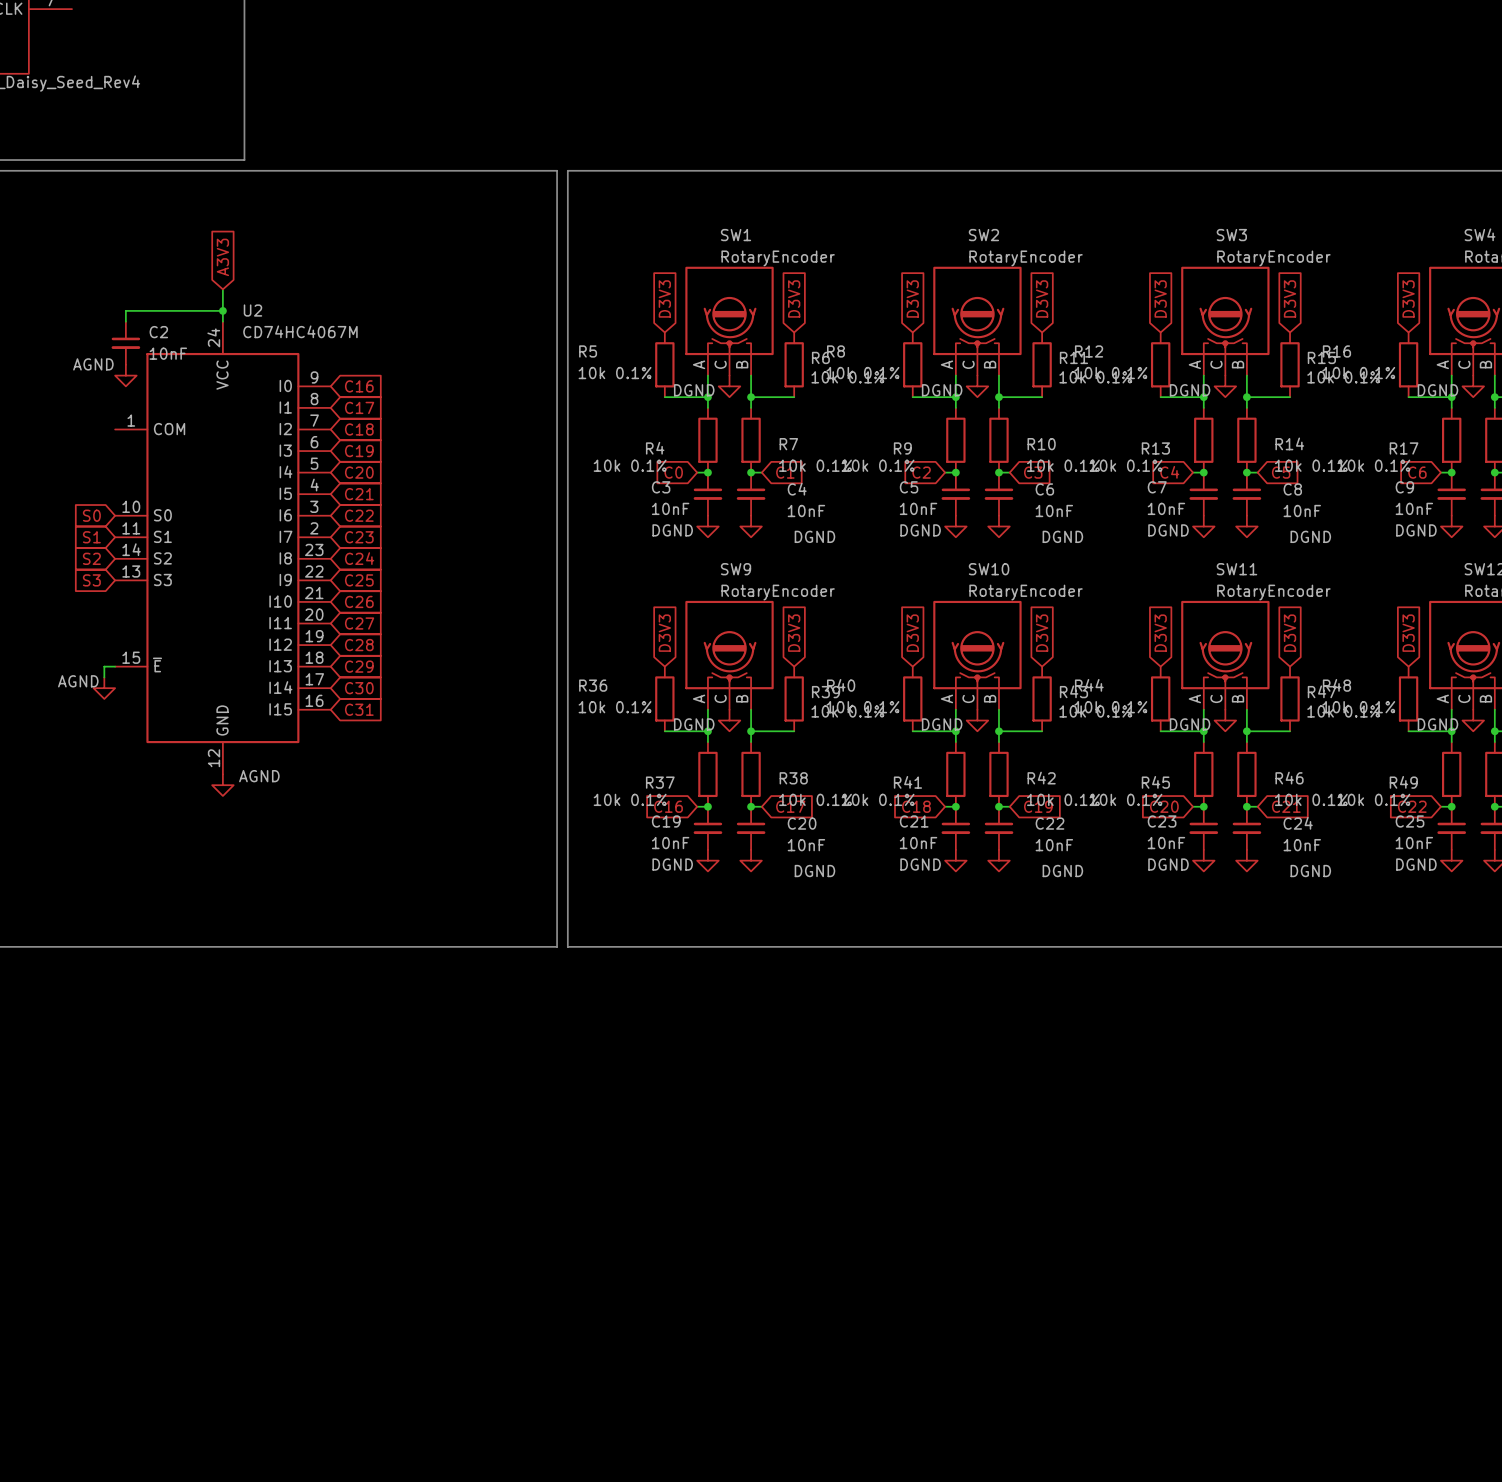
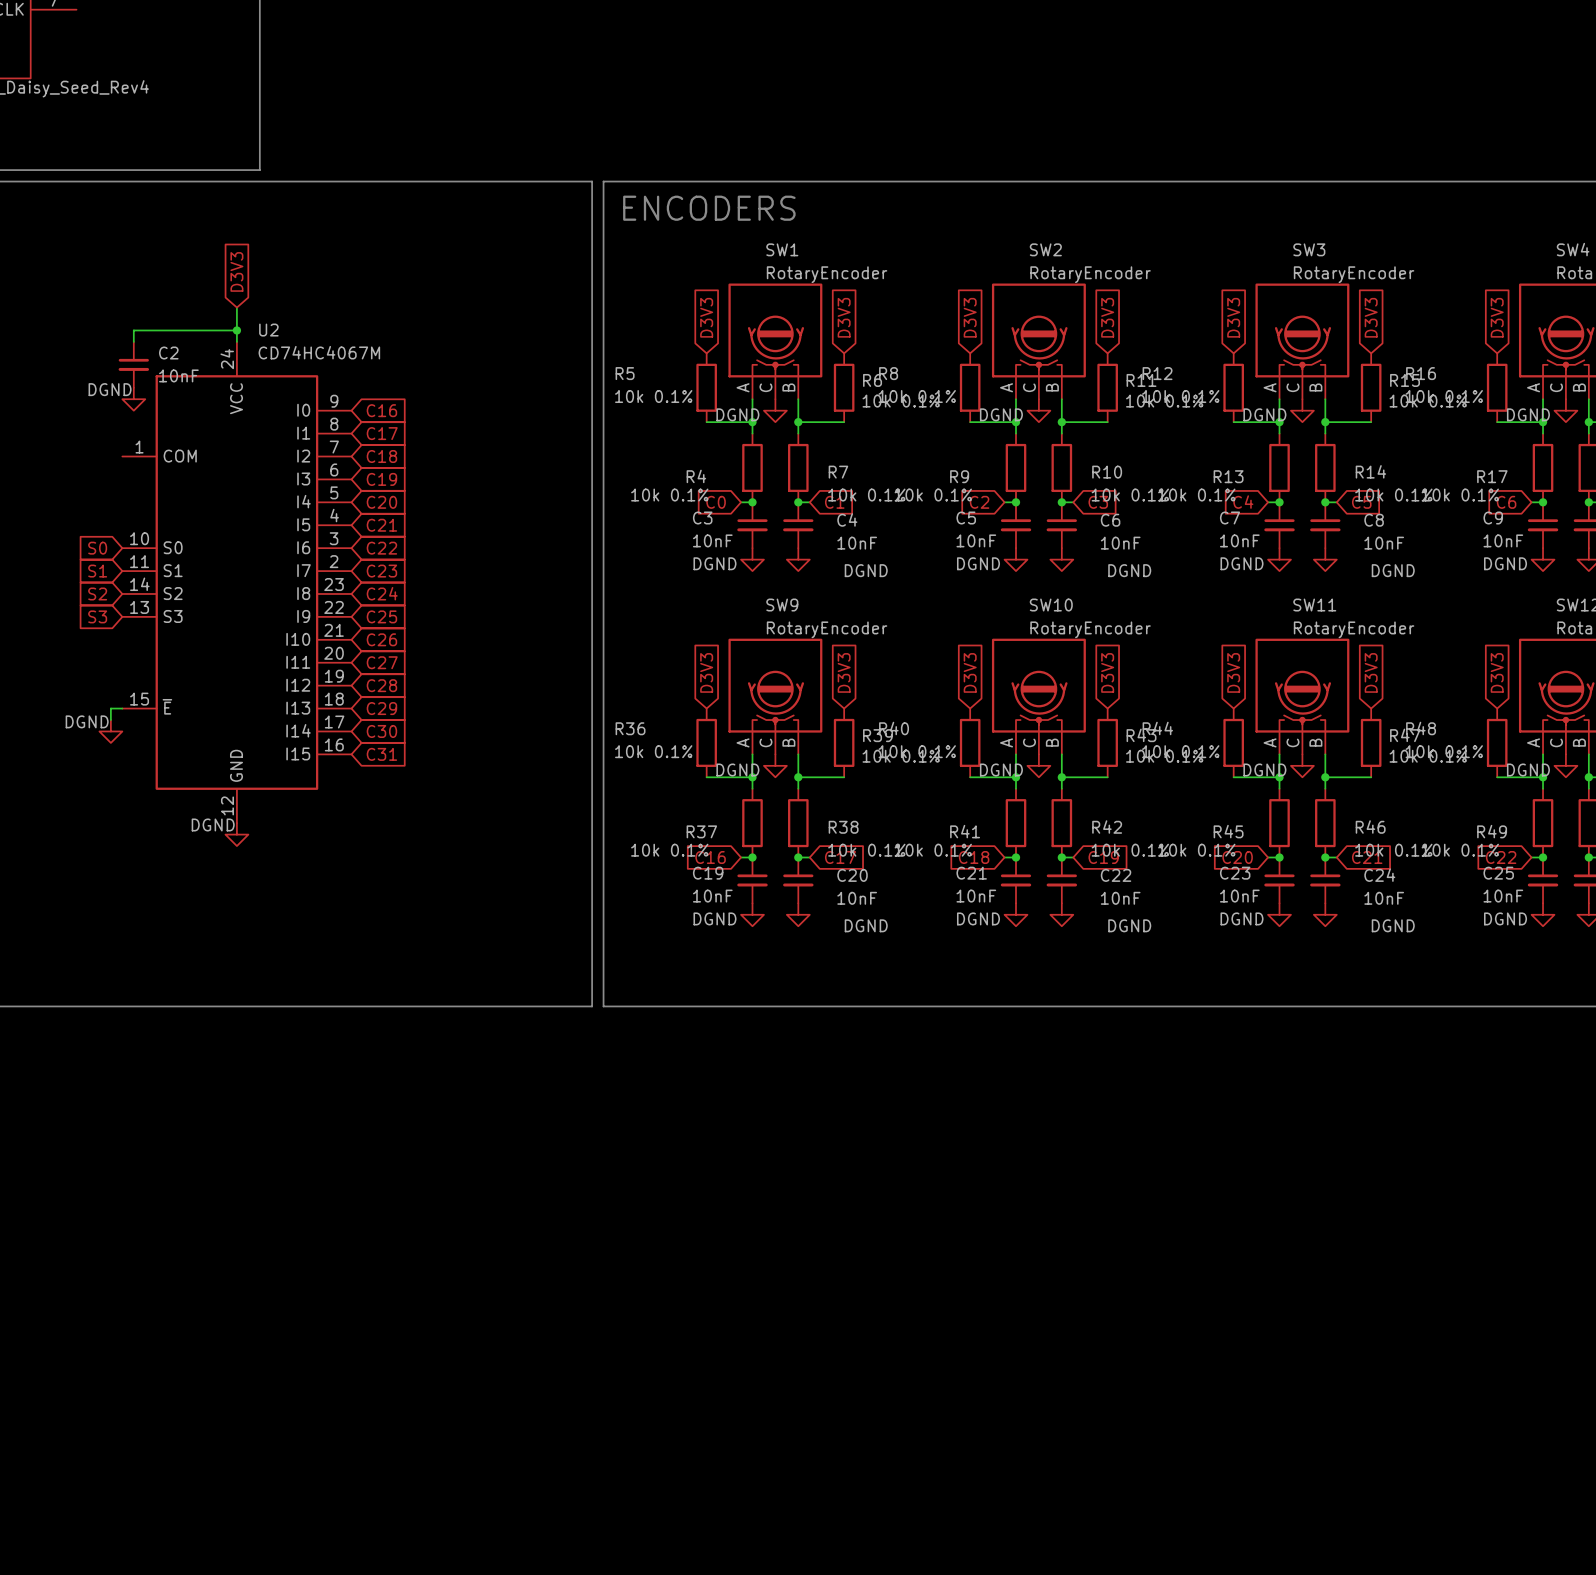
text: none -> ENCODERS (709, 208)
global label: A3V3 (222, 257) -> D3V3 (236, 271)
power symbol: AGND (125, 375) -> DGND (133, 399)
power symbol: AGND (104, 688) -> DGND (110, 731)
power symbol: AGND (222, 785) -> DGND (236, 834)

